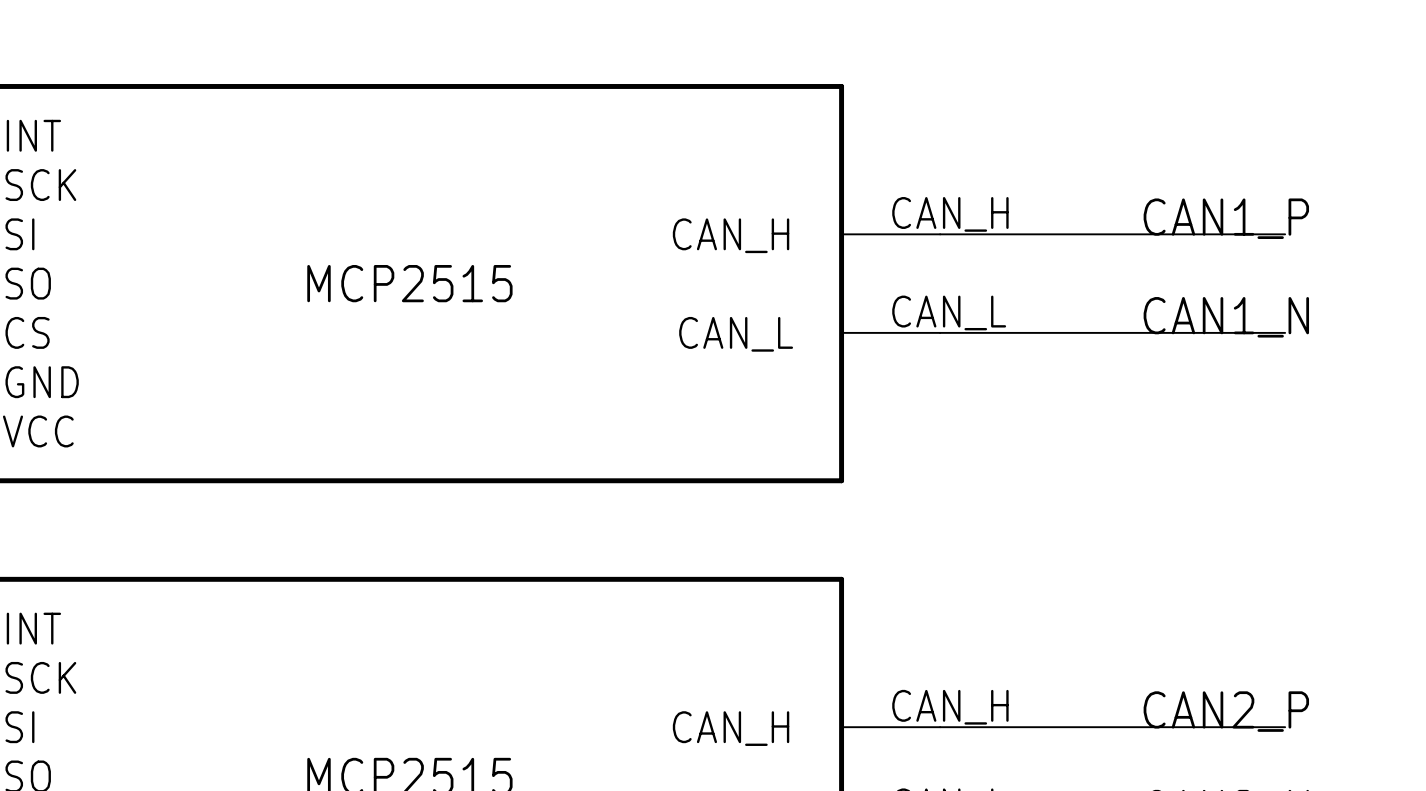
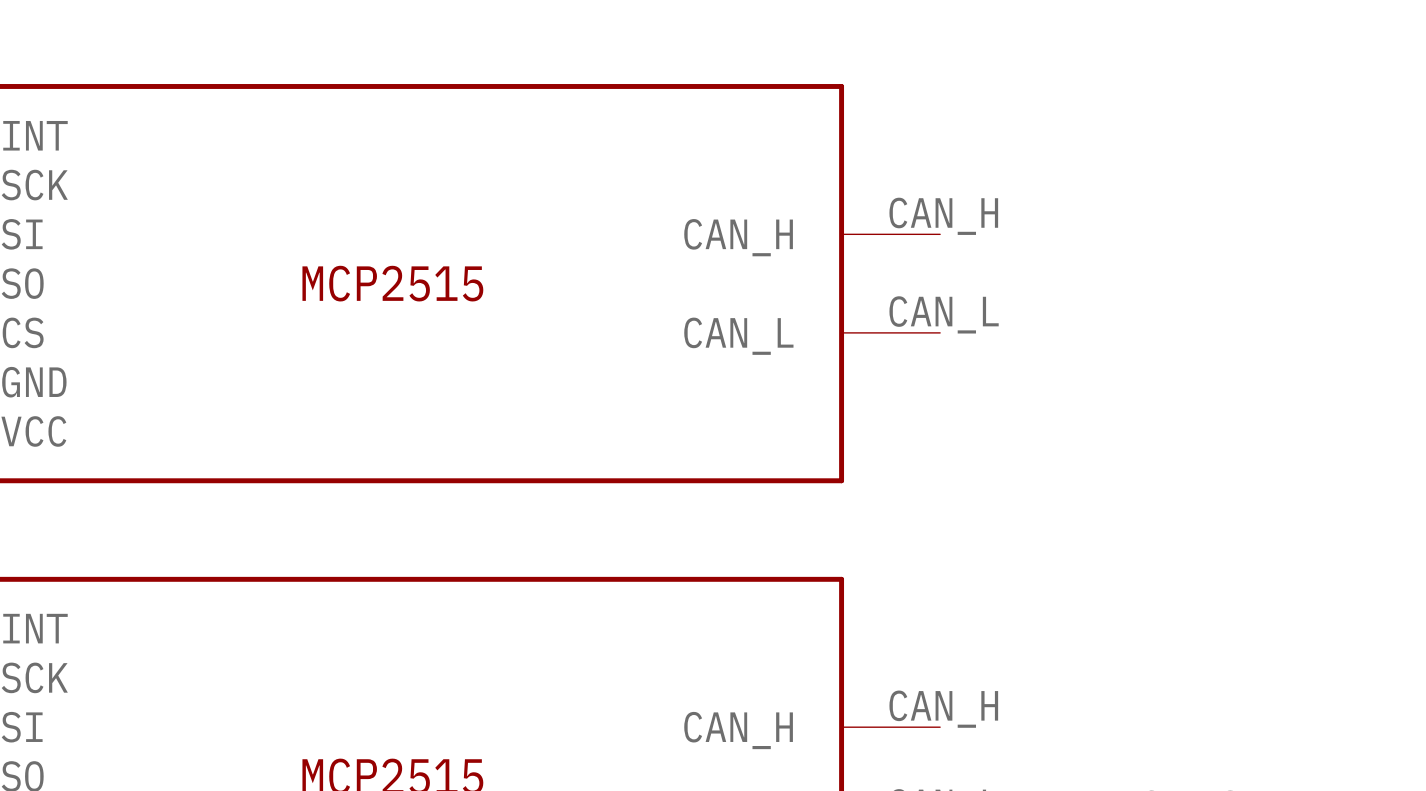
label: CAN1_P (1226, 218) -> none
wire: (940, 234) (1285, 234) -> none
label: CAN1_N (1226, 317) -> none
wire: (940, 332) (1285, 332) -> none
label: CAN2_P (1226, 711) -> none
wire: (940, 727) (1285, 727) -> none

